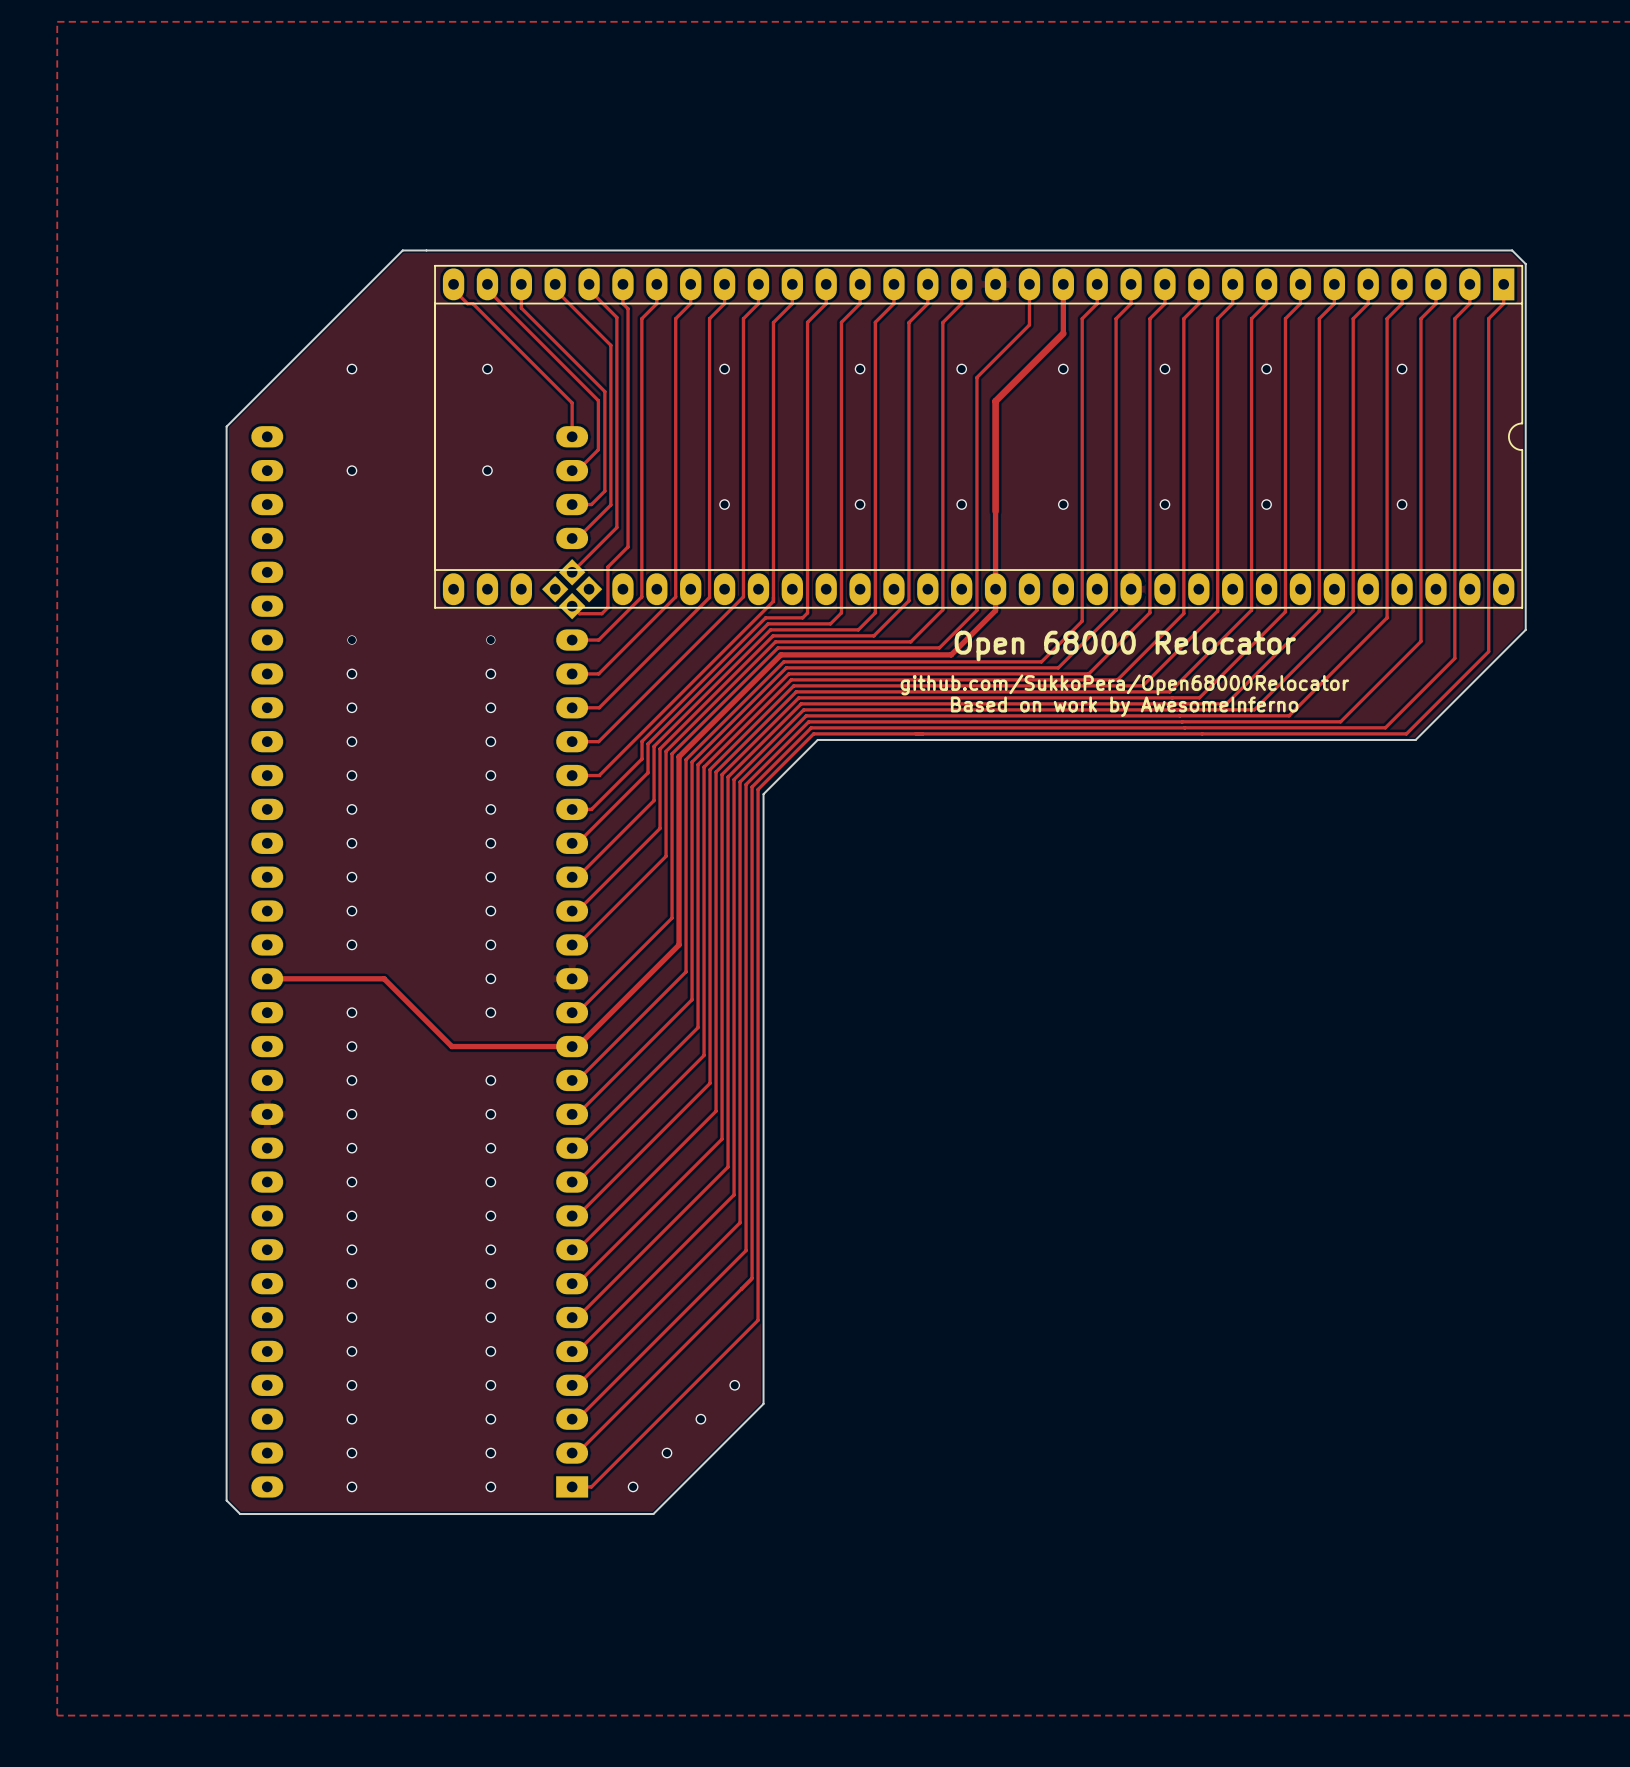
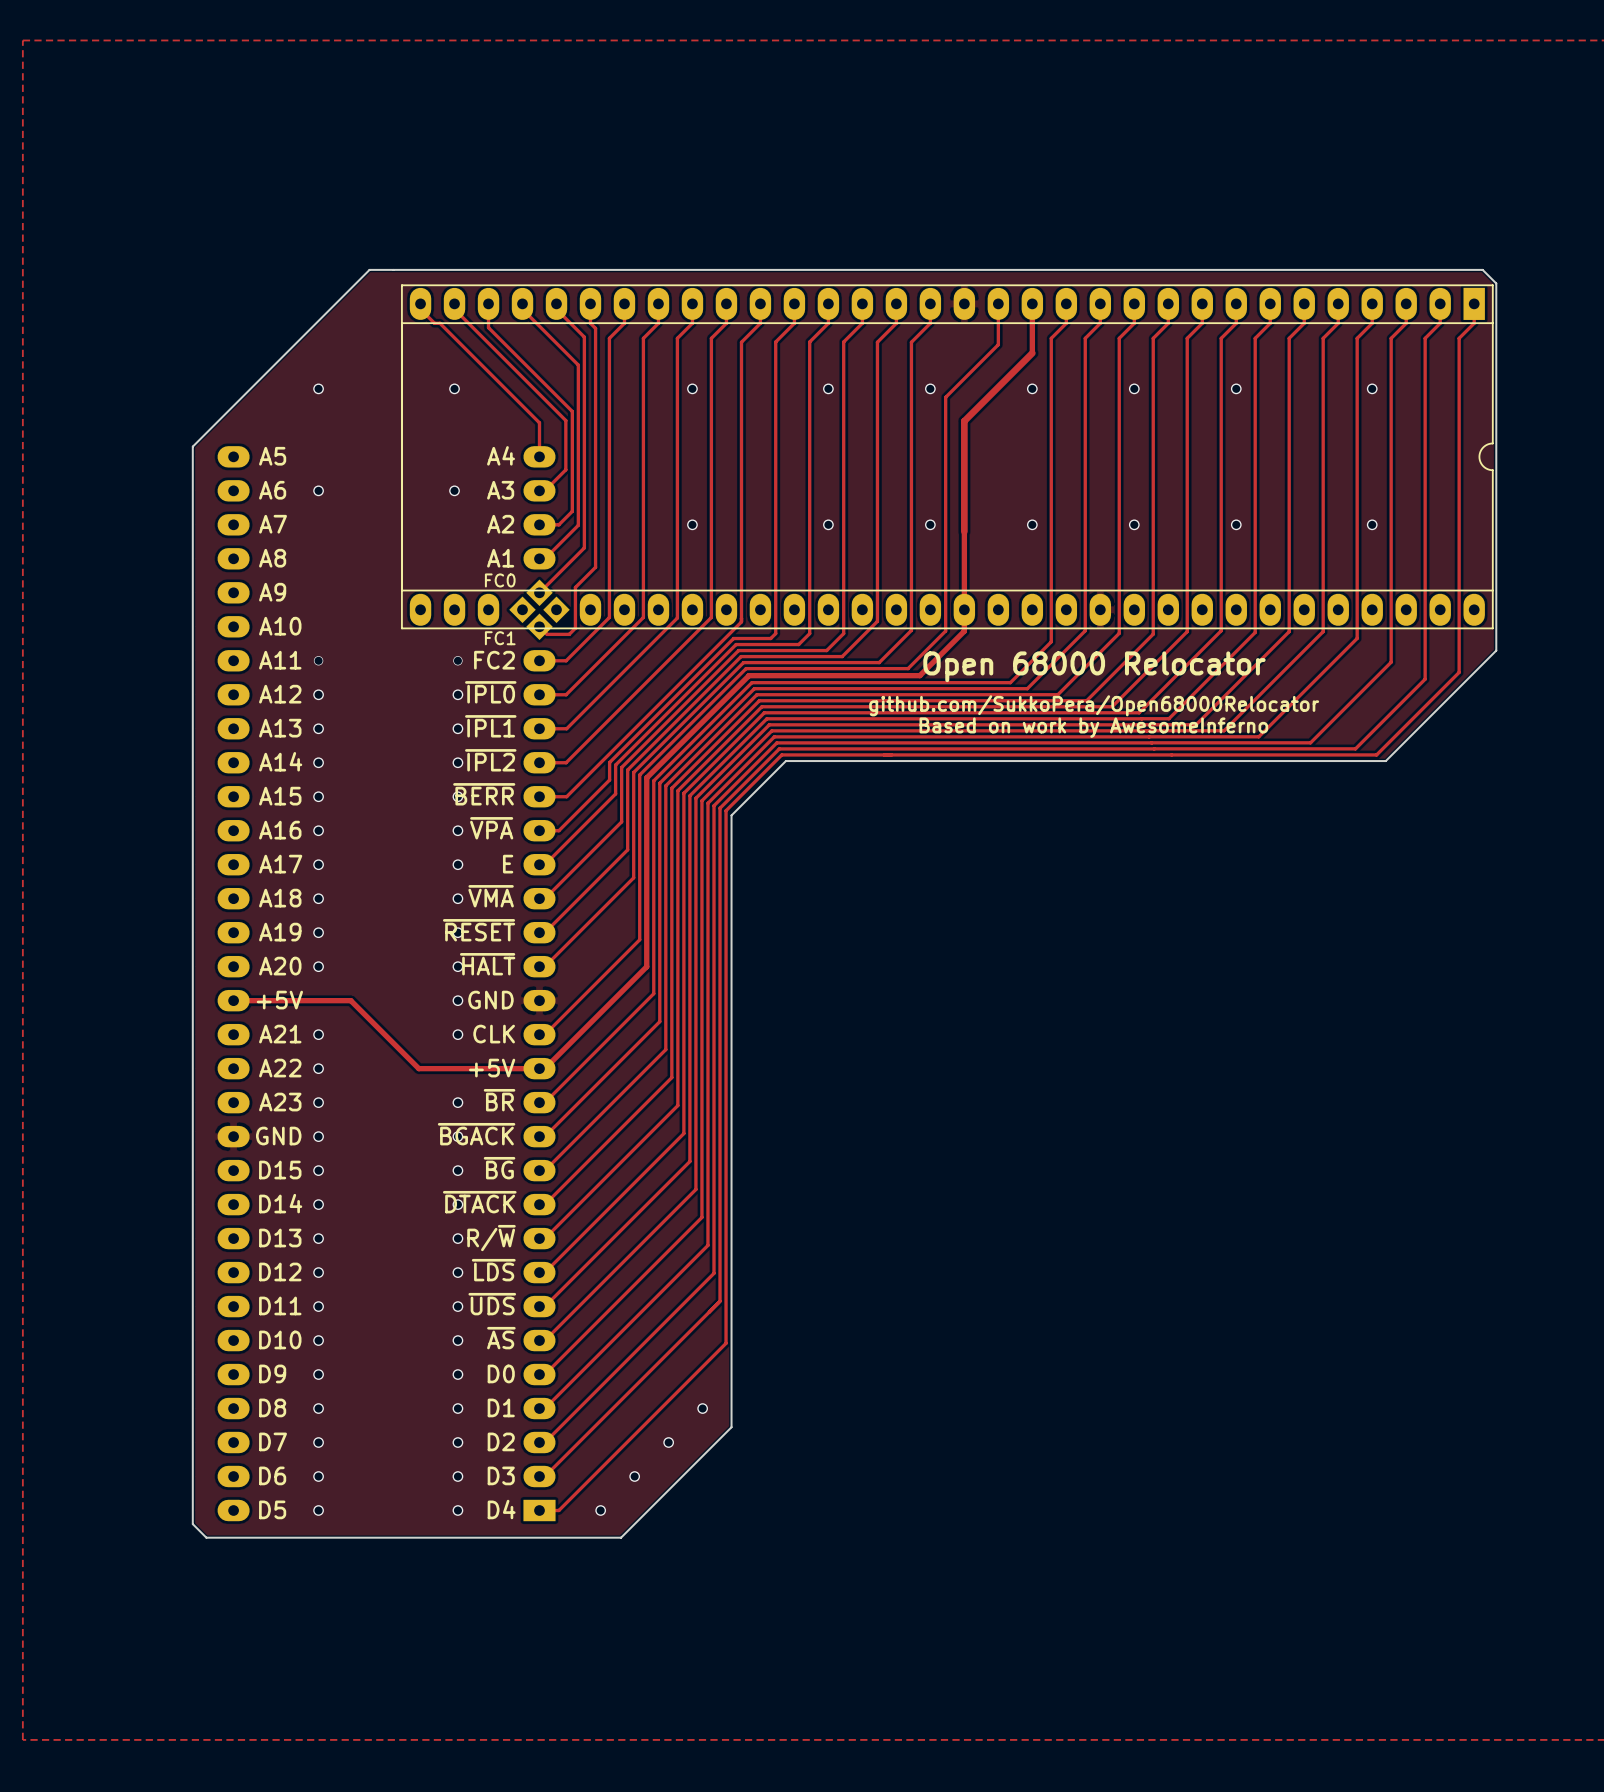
text: none -> A4 (501, 455)
text: none -> A5 (272, 456)
text: none -> A6 (272, 490)
text: none -> A3 (500, 490)
text: none -> A7 (273, 524)
text: none -> A2 (500, 524)
text: none -> A8 (272, 558)
text: none -> A1 (500, 558)
text: none -> FC0 (500, 580)
text: none -> A9 (272, 592)
text: none -> A10 (280, 626)
text: none -> FC1 (500, 638)
text: none -> A11 (280, 660)
text: none -> FC2 (494, 660)
text: none -> ~{IPL0} (490, 692)
text: none -> A12 (280, 694)
text: none -> ~{IPL1} (490, 726)
text: none -> A13 (280, 728)
text: none -> ~{IPL2} (490, 760)
text: none -> A14 (280, 761)
text: none -> ~{BERR} (484, 794)
text: none -> A15 (280, 796)
text: none -> ~{VPA} (491, 828)
text: none -> A16 (280, 830)
text: none -> A17 (280, 864)
text: none -> E (508, 864)
text: none -> ~{VMA} (491, 896)
text: none -> A18 (280, 898)
text: none -> ~{RESET} (479, 930)
text: none -> A19 (280, 932)
text: none -> ~{HALT} (487, 964)
text: none -> A20 (280, 966)
text: none -> +5V (279, 1000)
text: none -> GND (490, 1000)
text: none -> A21 (280, 1034)
text: none -> CLK (494, 1034)
text: none -> A22 (280, 1068)
text: none -> +5V (492, 1068)
text: none -> ~{BR} (499, 1100)
text: none -> A23 (280, 1102)
text: none -> ~{BGACK} (476, 1134)
text: none -> GND (278, 1136)
text: none -> ~{BG} (499, 1168)
text: none -> D15 (280, 1170)
text: none -> ~{DTACK} (479, 1202)
text: none -> D14 (280, 1203)
text: none -> D13 (280, 1237)
text: none -> R/~{W} (491, 1238)
text: none -> ~{LDS} (493, 1270)
text: none -> D12 (280, 1271)
text: none -> ~{UDS} (492, 1304)
text: none -> D11 (280, 1305)
text: none -> ~{AS} (501, 1338)
text: none -> D10 (280, 1339)
text: none -> D9 (272, 1373)
text: none -> D0 (501, 1373)
text: none -> D8 (272, 1407)
text: none -> D1 (501, 1407)
text: none -> D7 (273, 1441)
text: none -> D2 (501, 1441)
text: none -> D6 (272, 1475)
text: none -> D3 (501, 1475)
text: none -> D4 (501, 1509)
text: none -> D5 (272, 1509)

